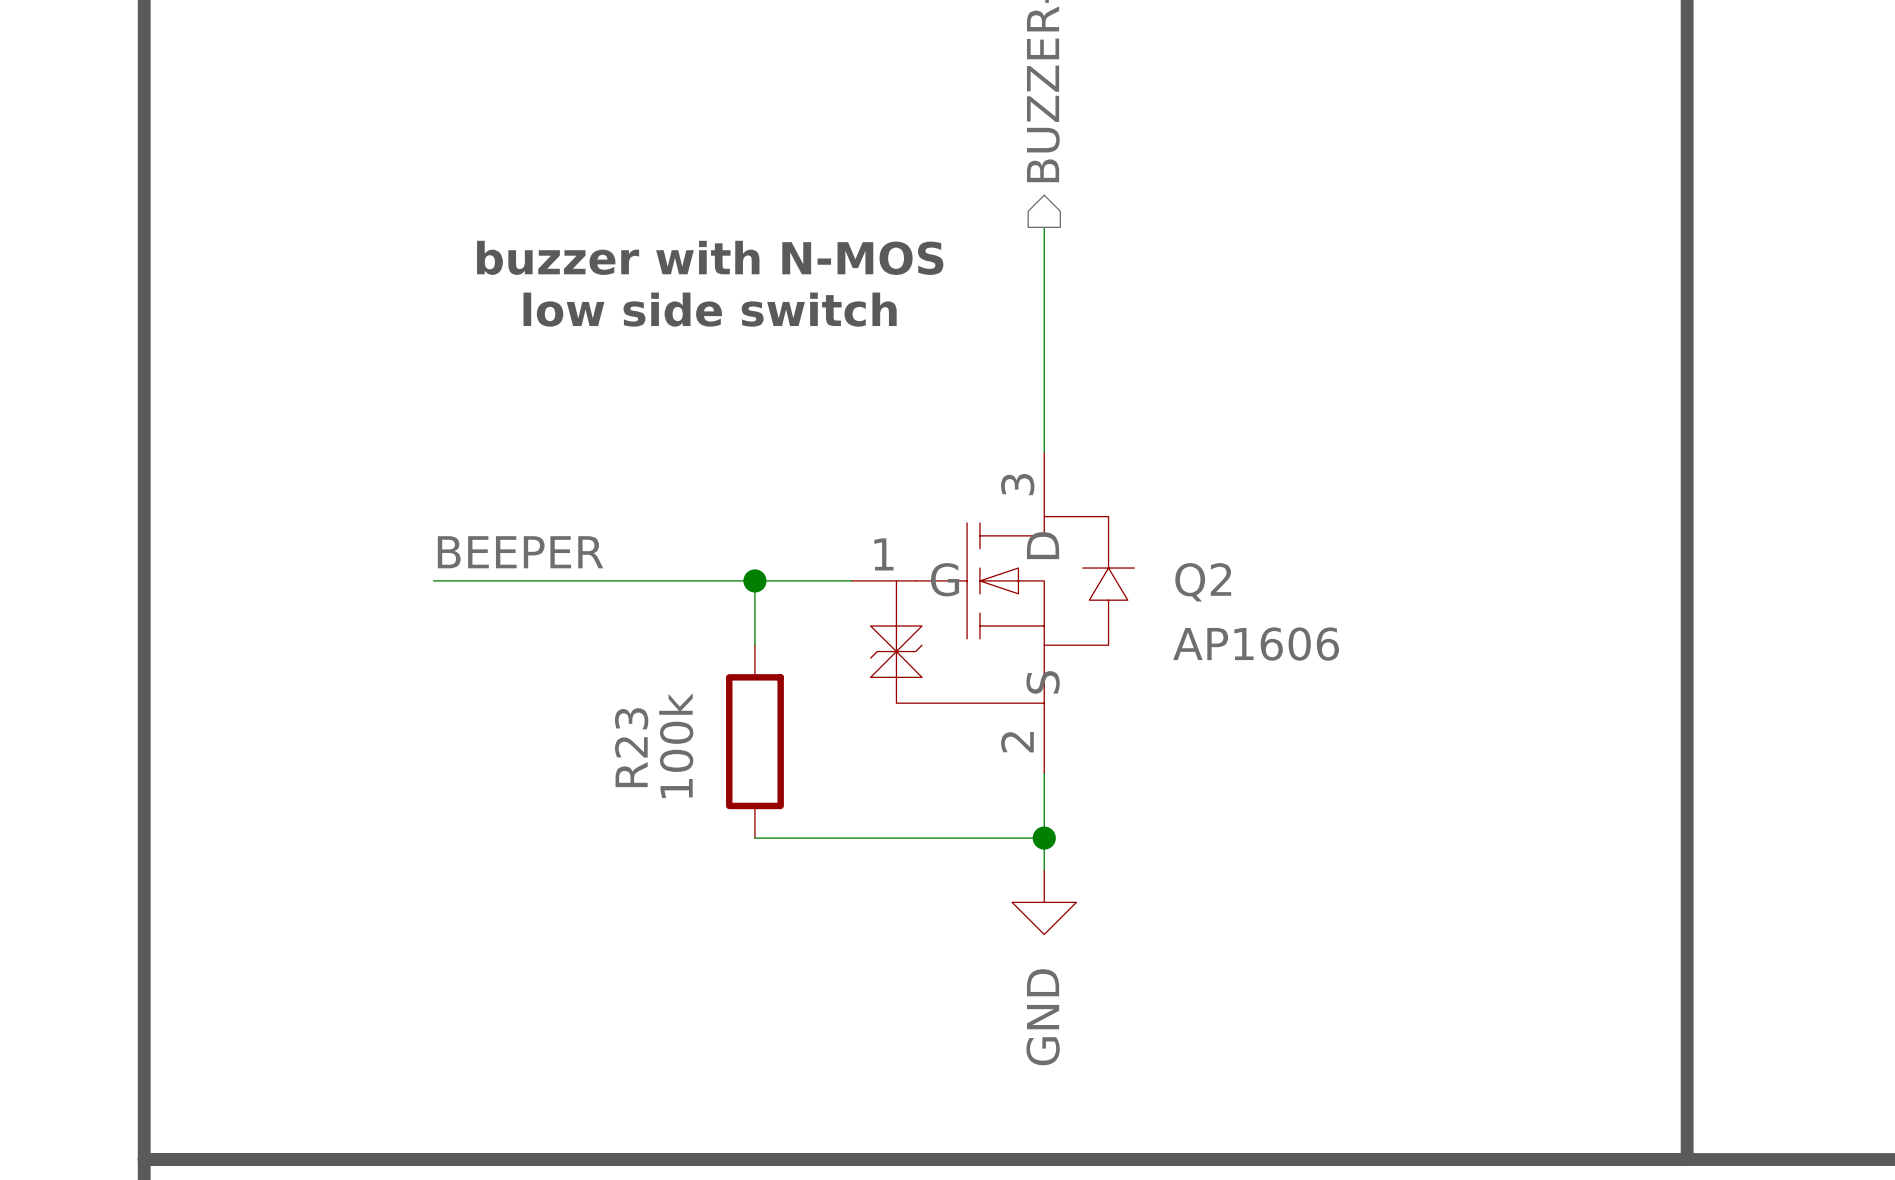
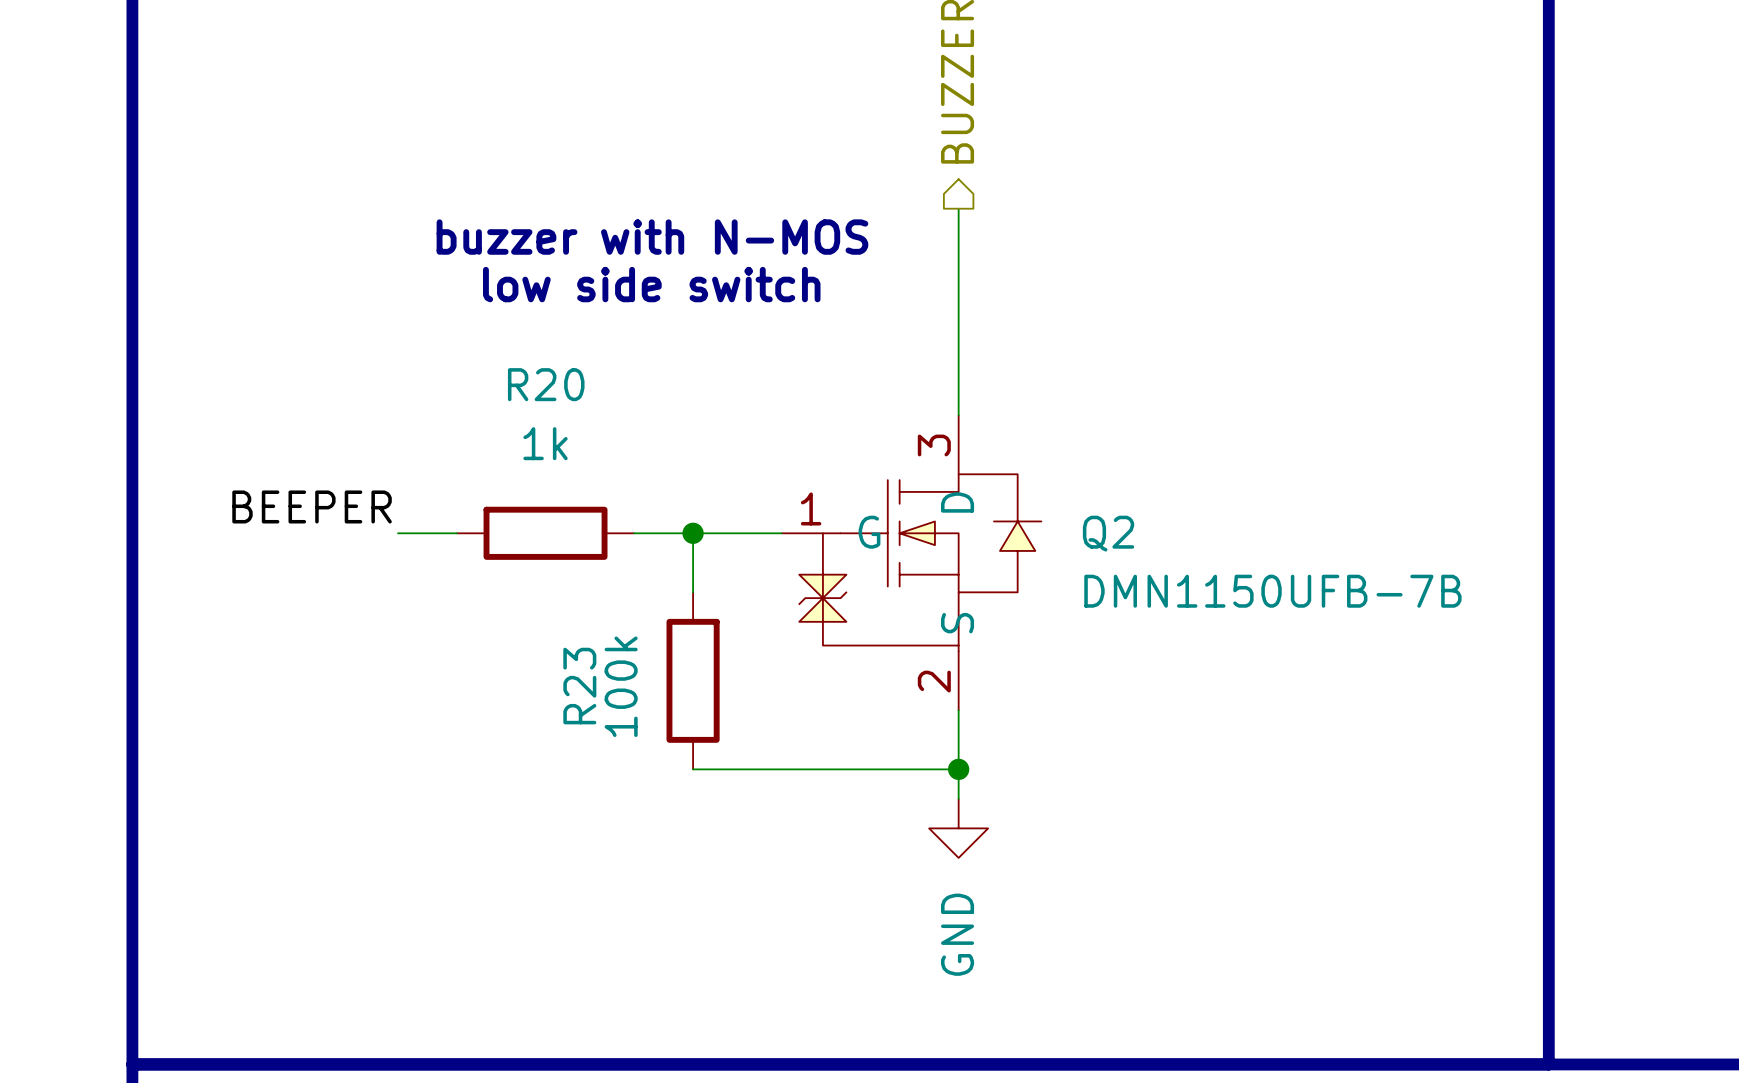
label position: BEEPER (520, 552) -> BEEPER (312, 506)
wire: (497, 580) (690, 580) -> none
R20: none -> 1k (545, 533)
Q2 value: AP1606 (1256, 644) -> DMN1150UFB-7B (1272, 591)

